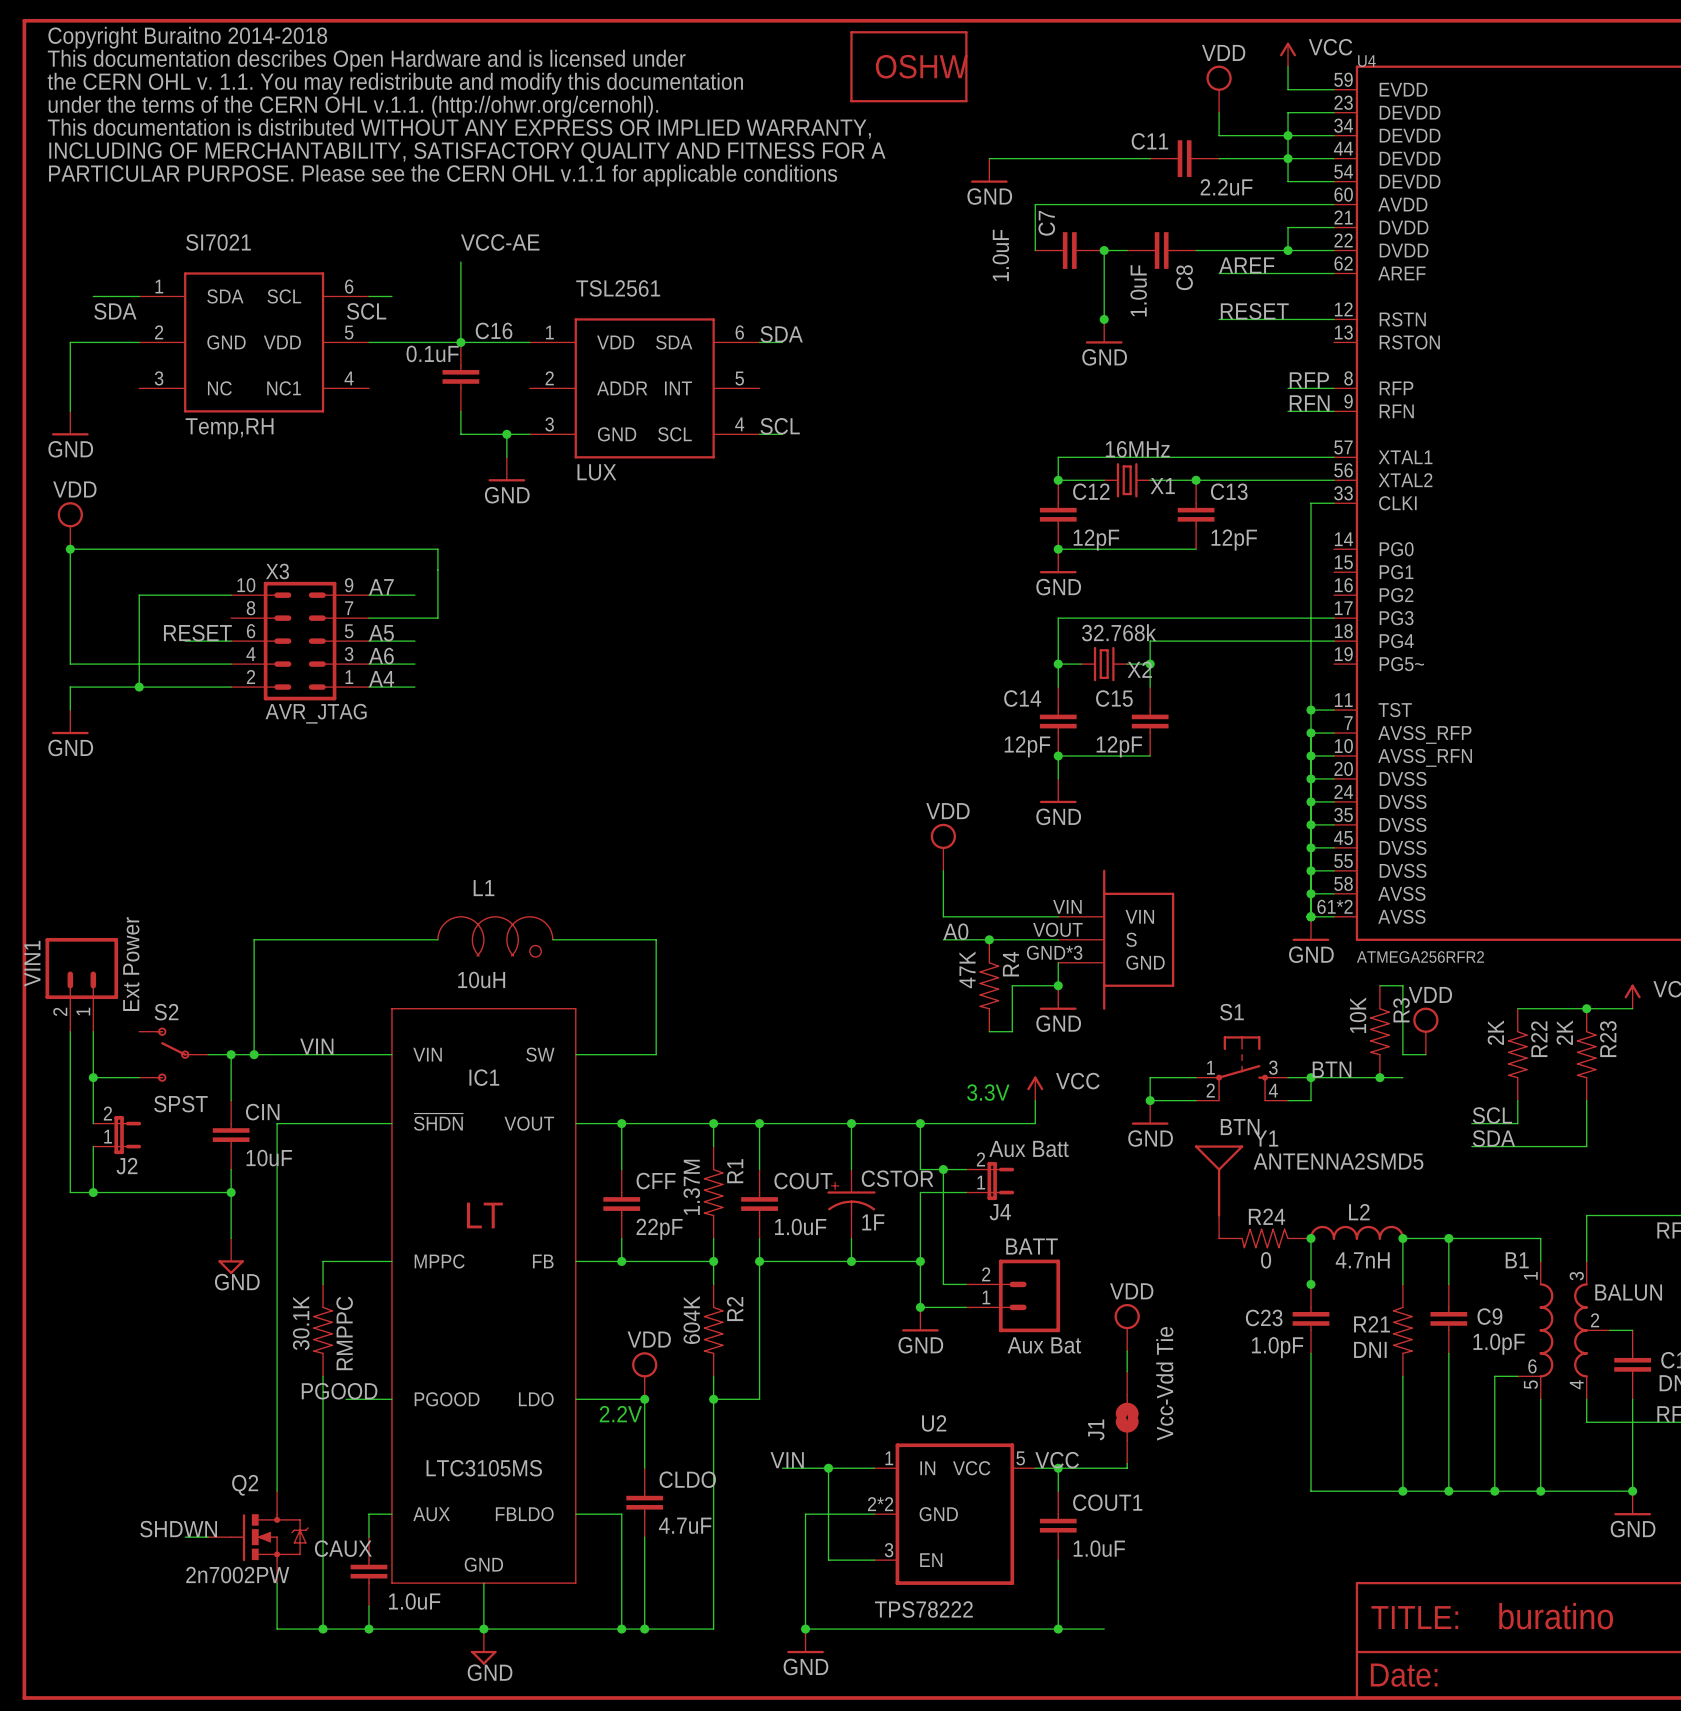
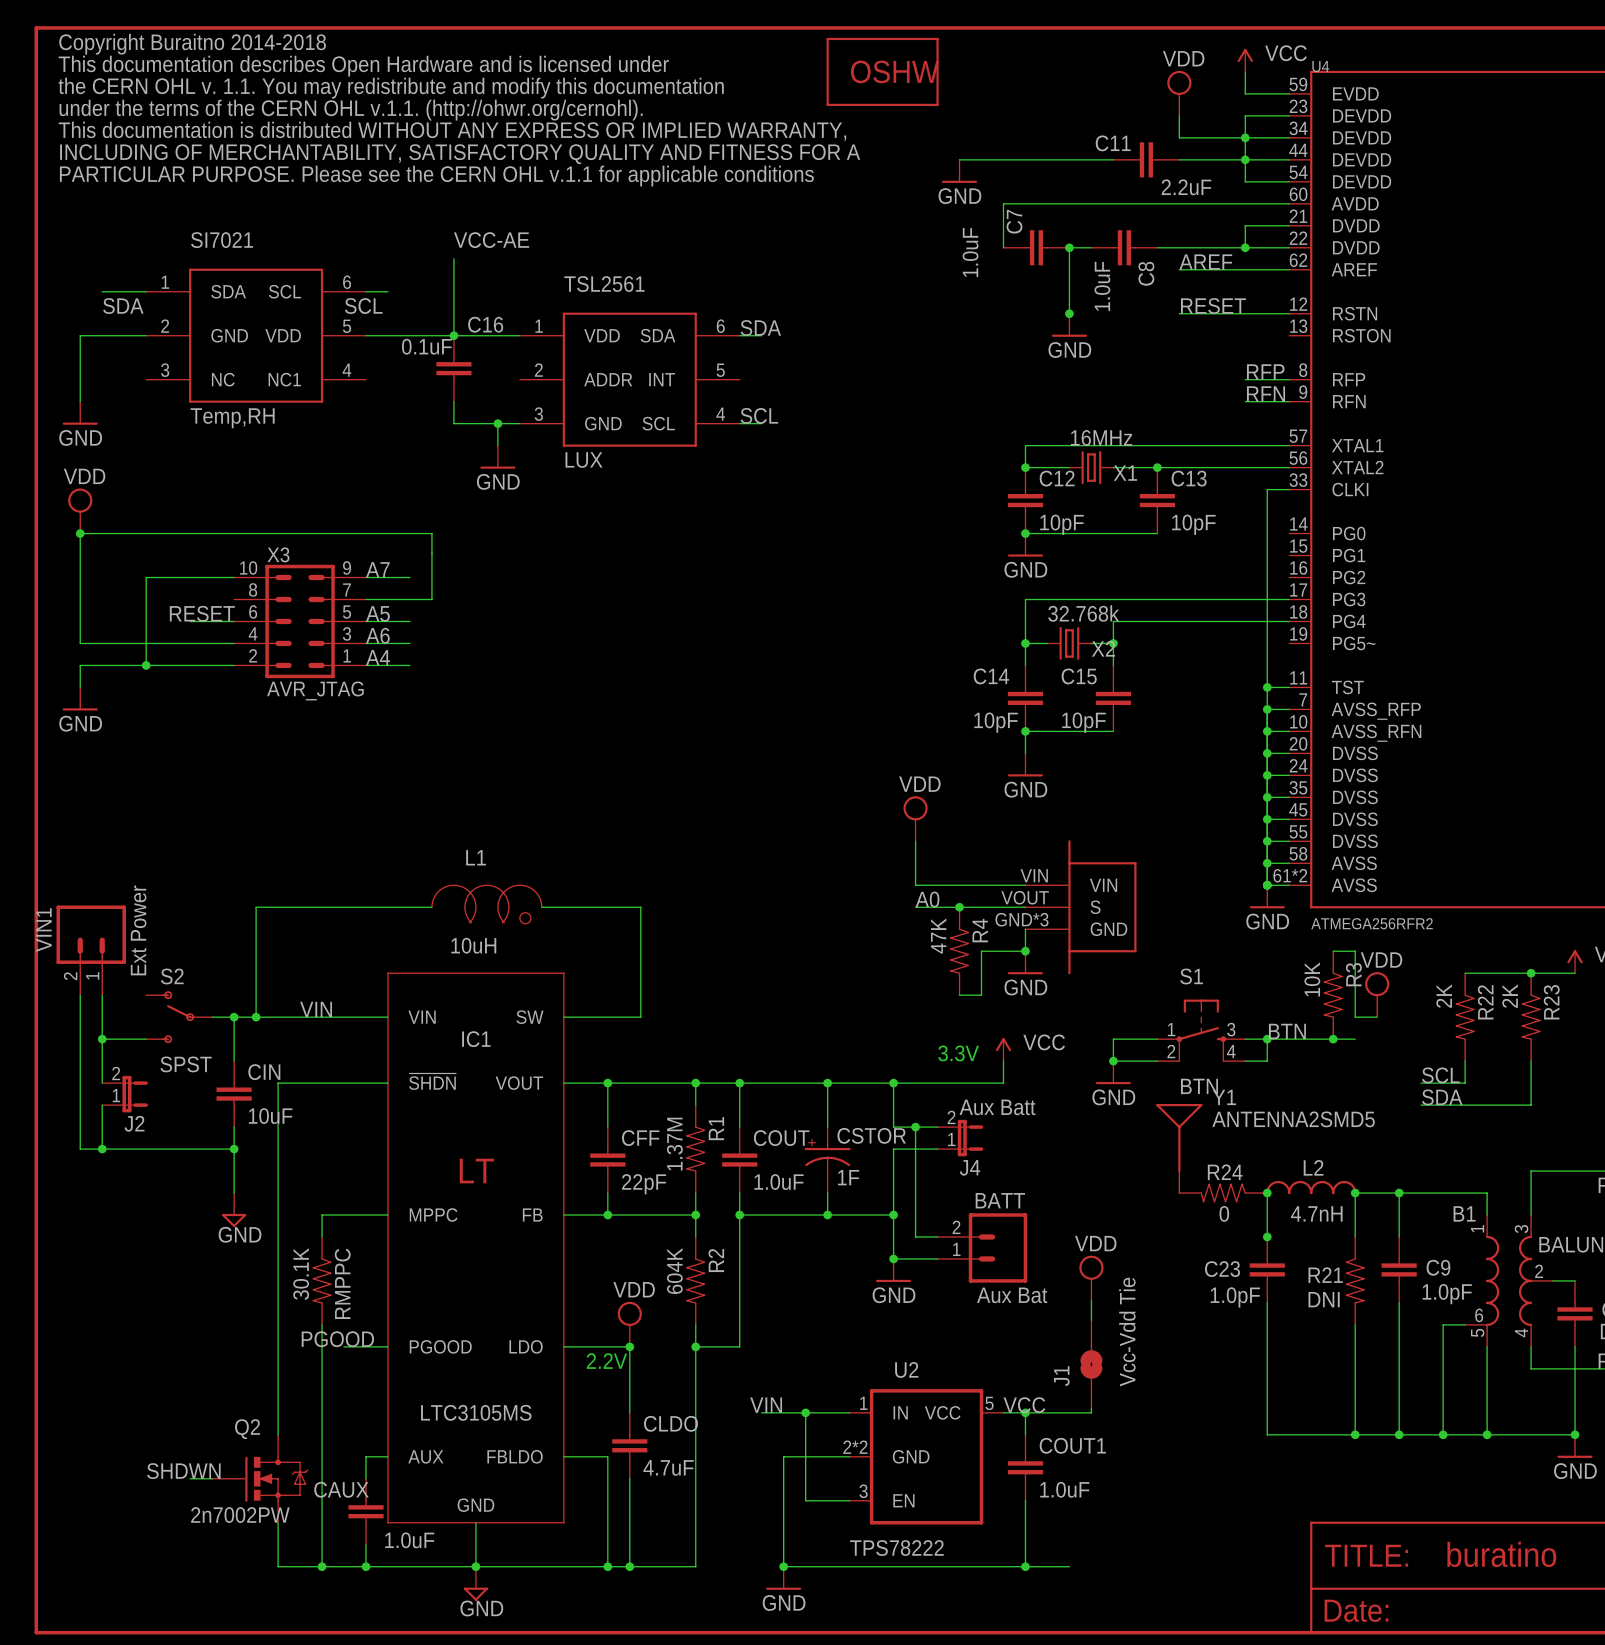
C12 value: 12pF (1096, 540) -> 10pF (1061, 524)
C13 value: 12pF (1234, 540) -> 10pF (1193, 524)
C14 value: 12pF (1027, 746) -> 10pF (996, 722)
C15 value: 12pF (1119, 746) -> 10pF (1083, 722)

